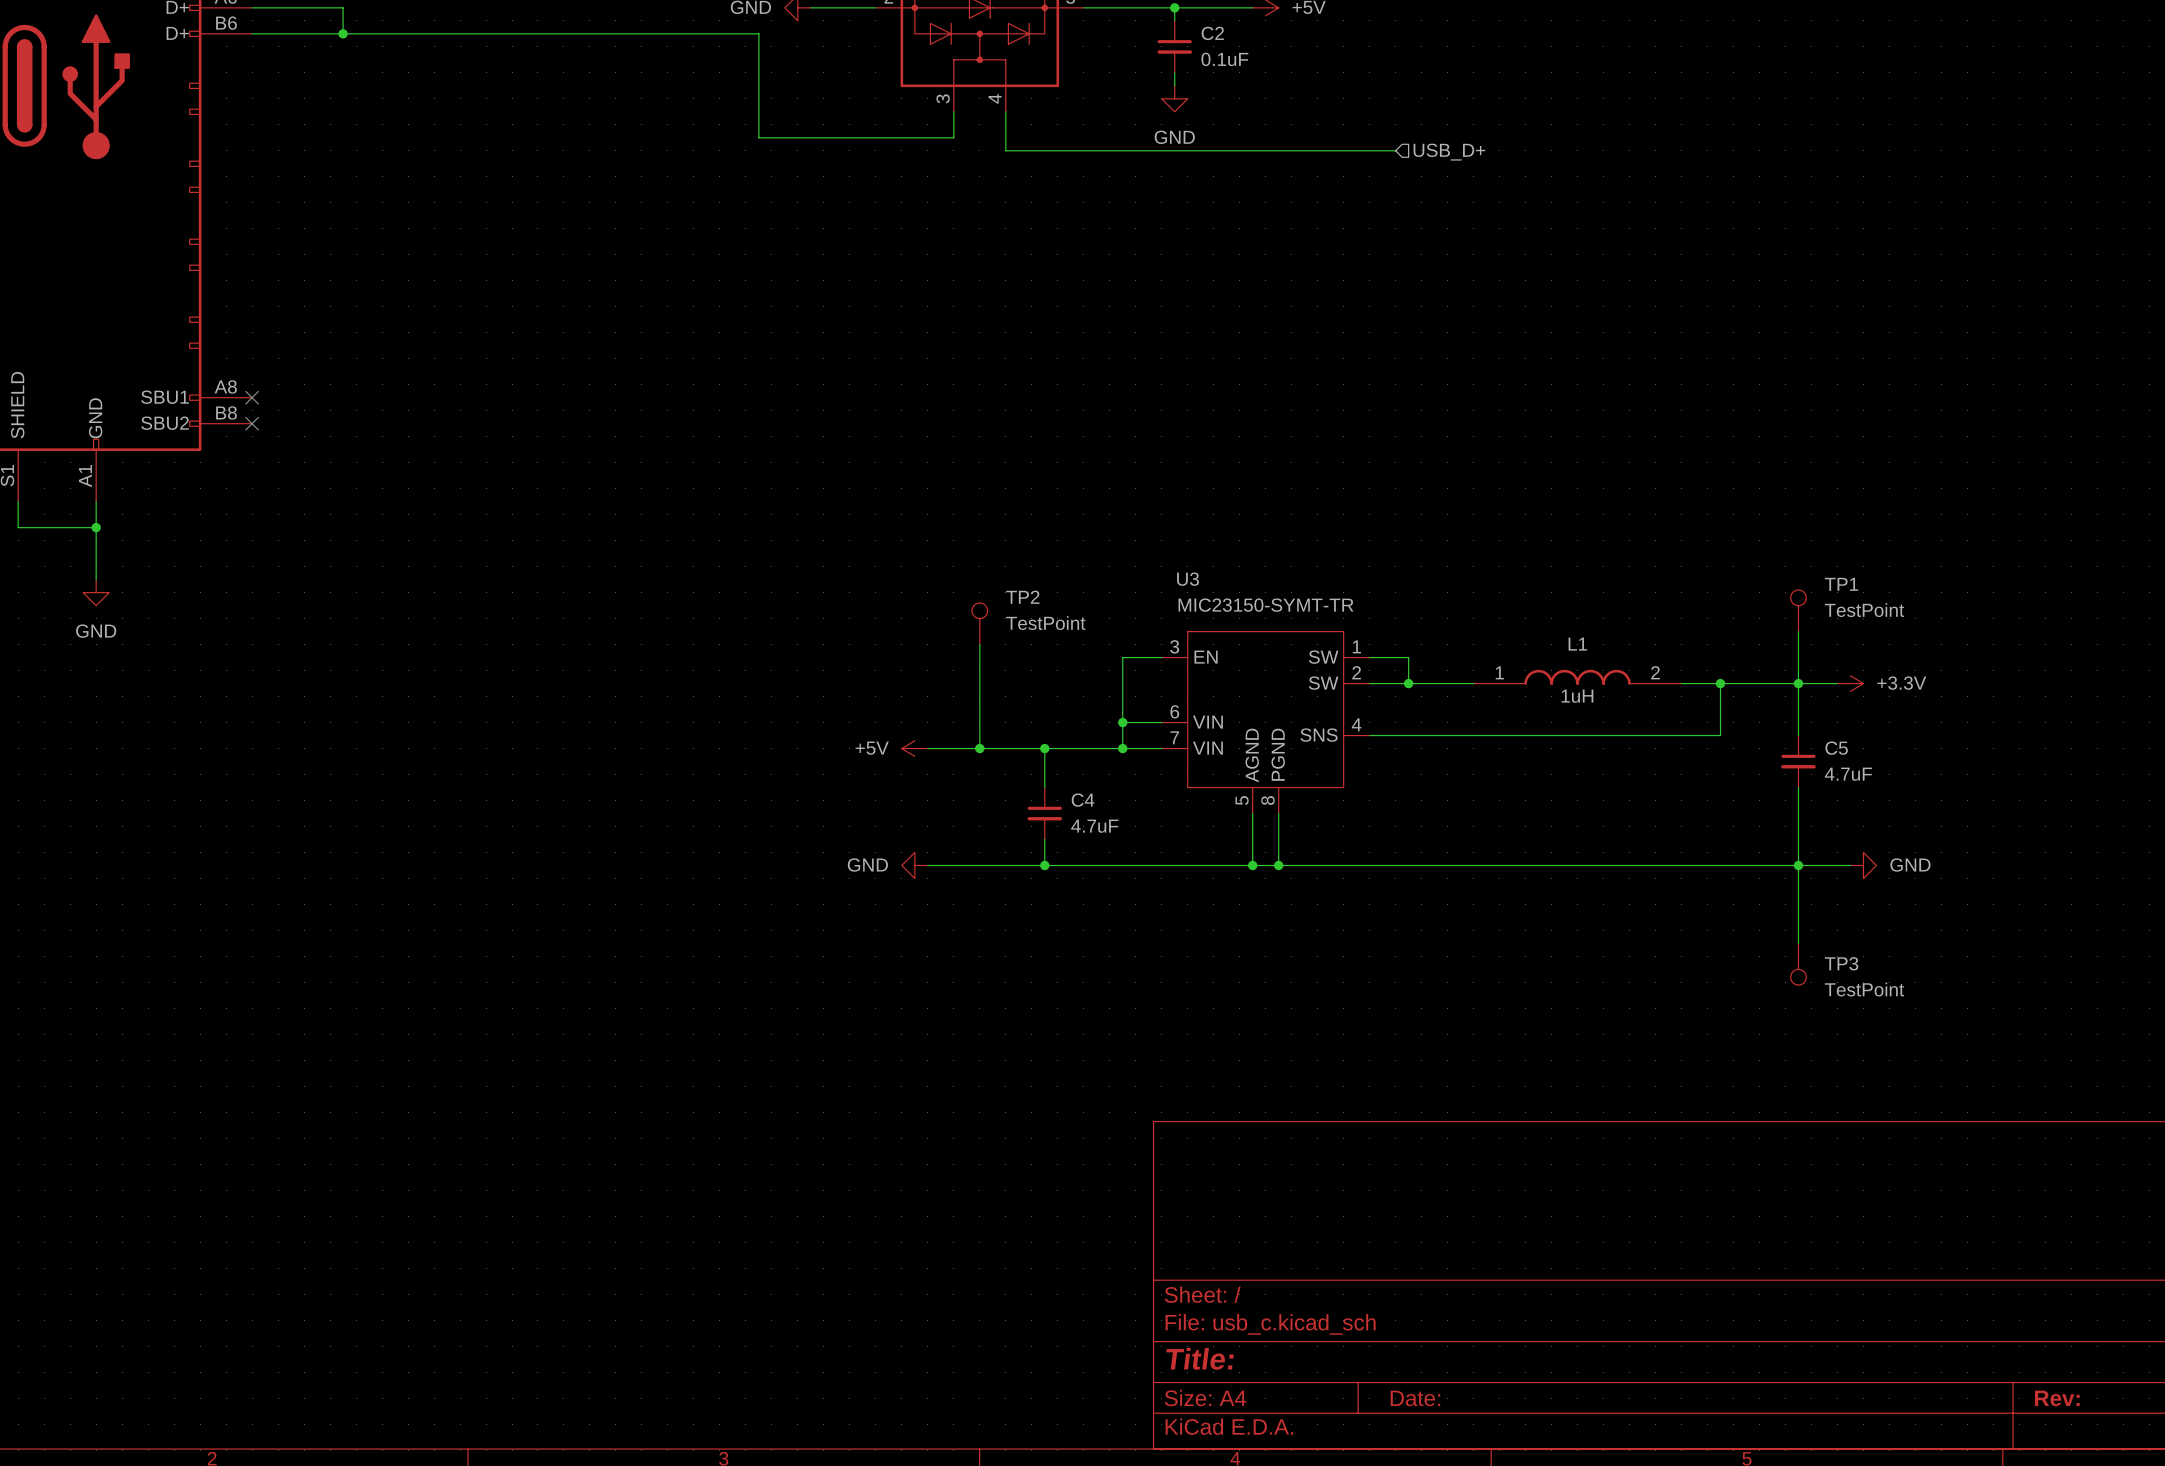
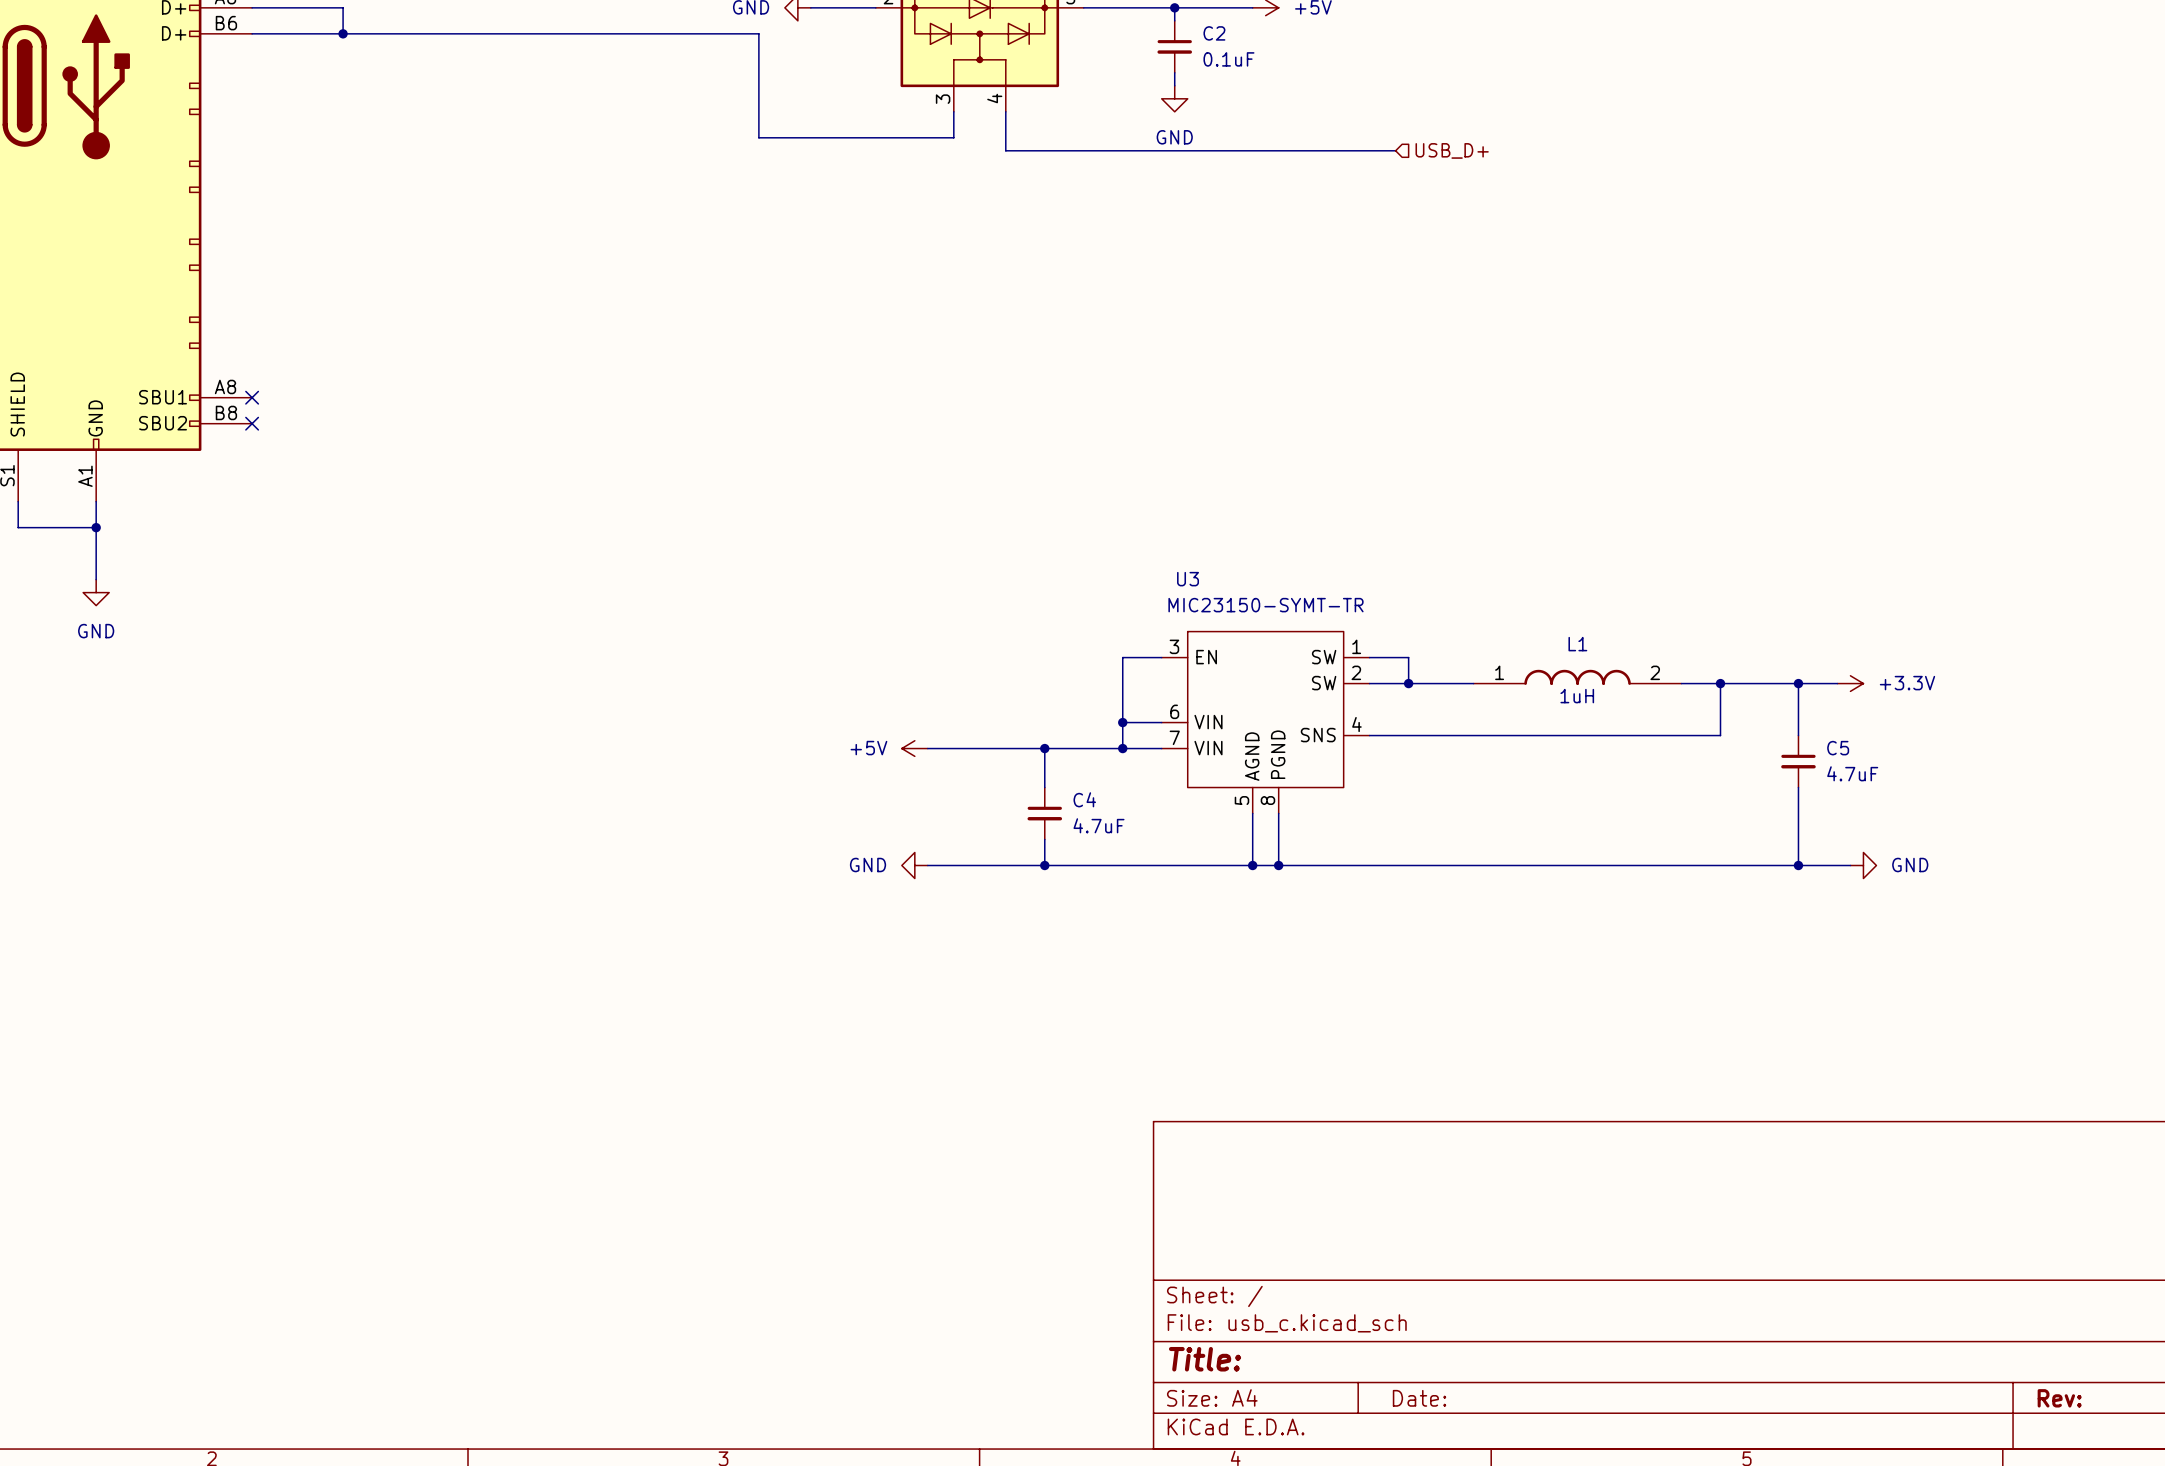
TP1: TestPoint (1798, 610) -> none
TP2: TestPoint (979, 623) -> none
wire: (1798, 631) (1798, 683) -> none
wire: (979, 644) (979, 748) -> none
junction: (979, 748) -> none
wire: (1798, 865) (1798, 943) -> none
TP3: TestPoint (1798, 964) -> none

